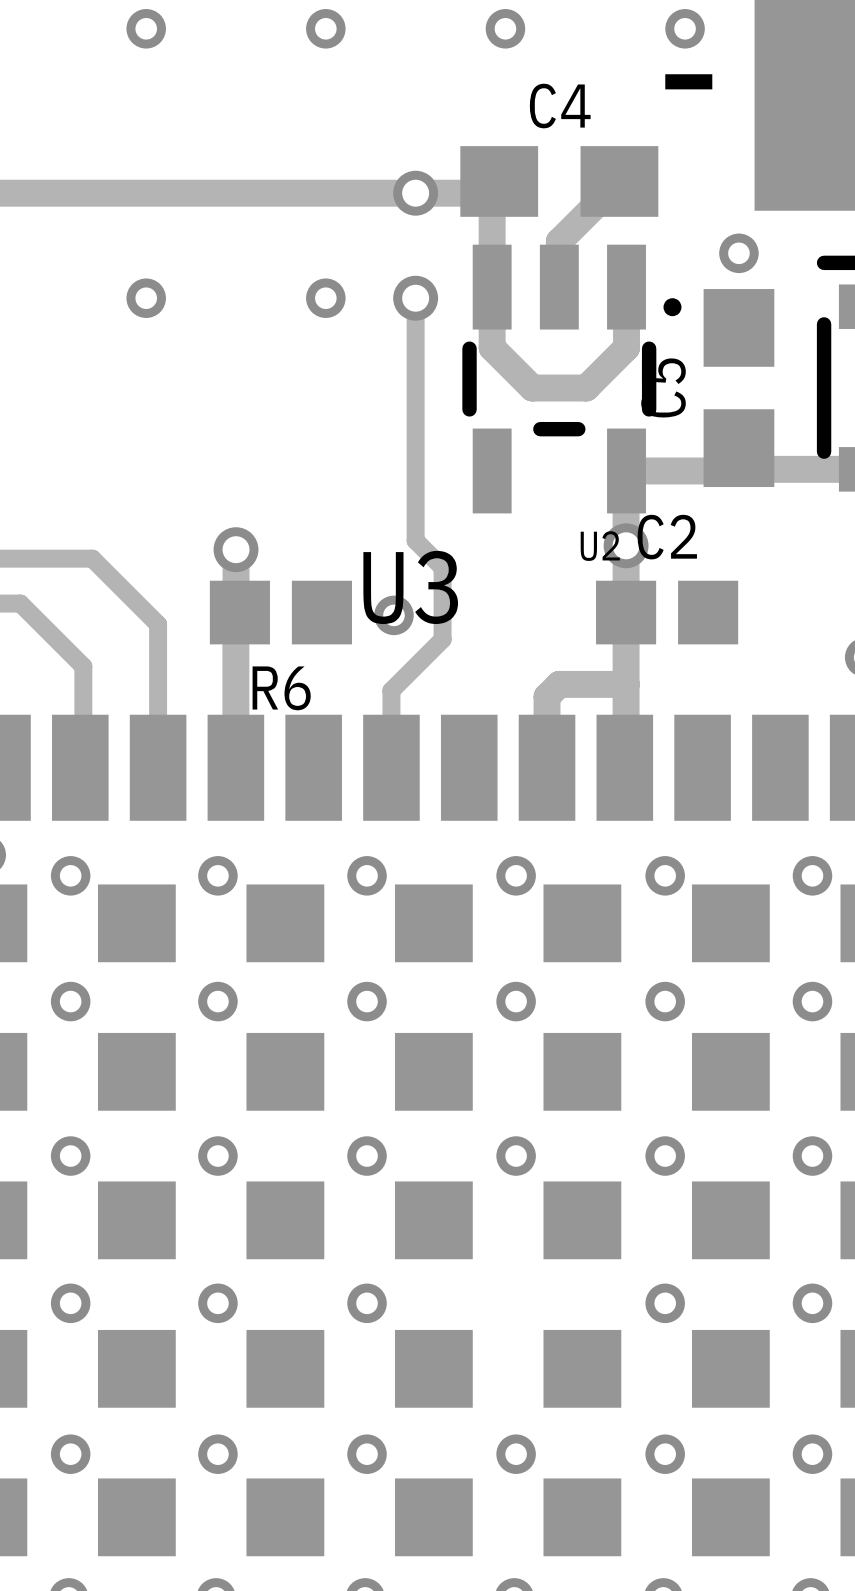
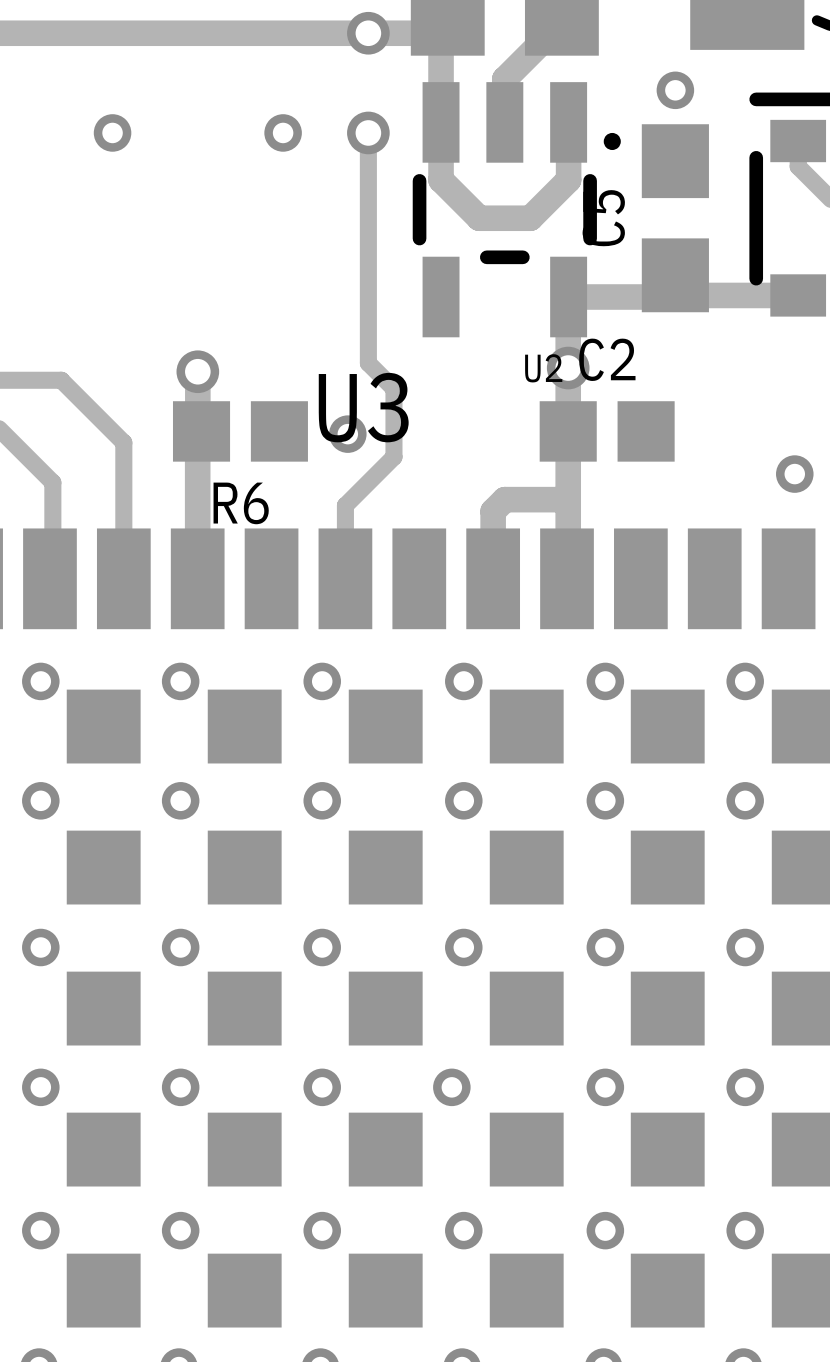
via: none -> (451, 1087)

